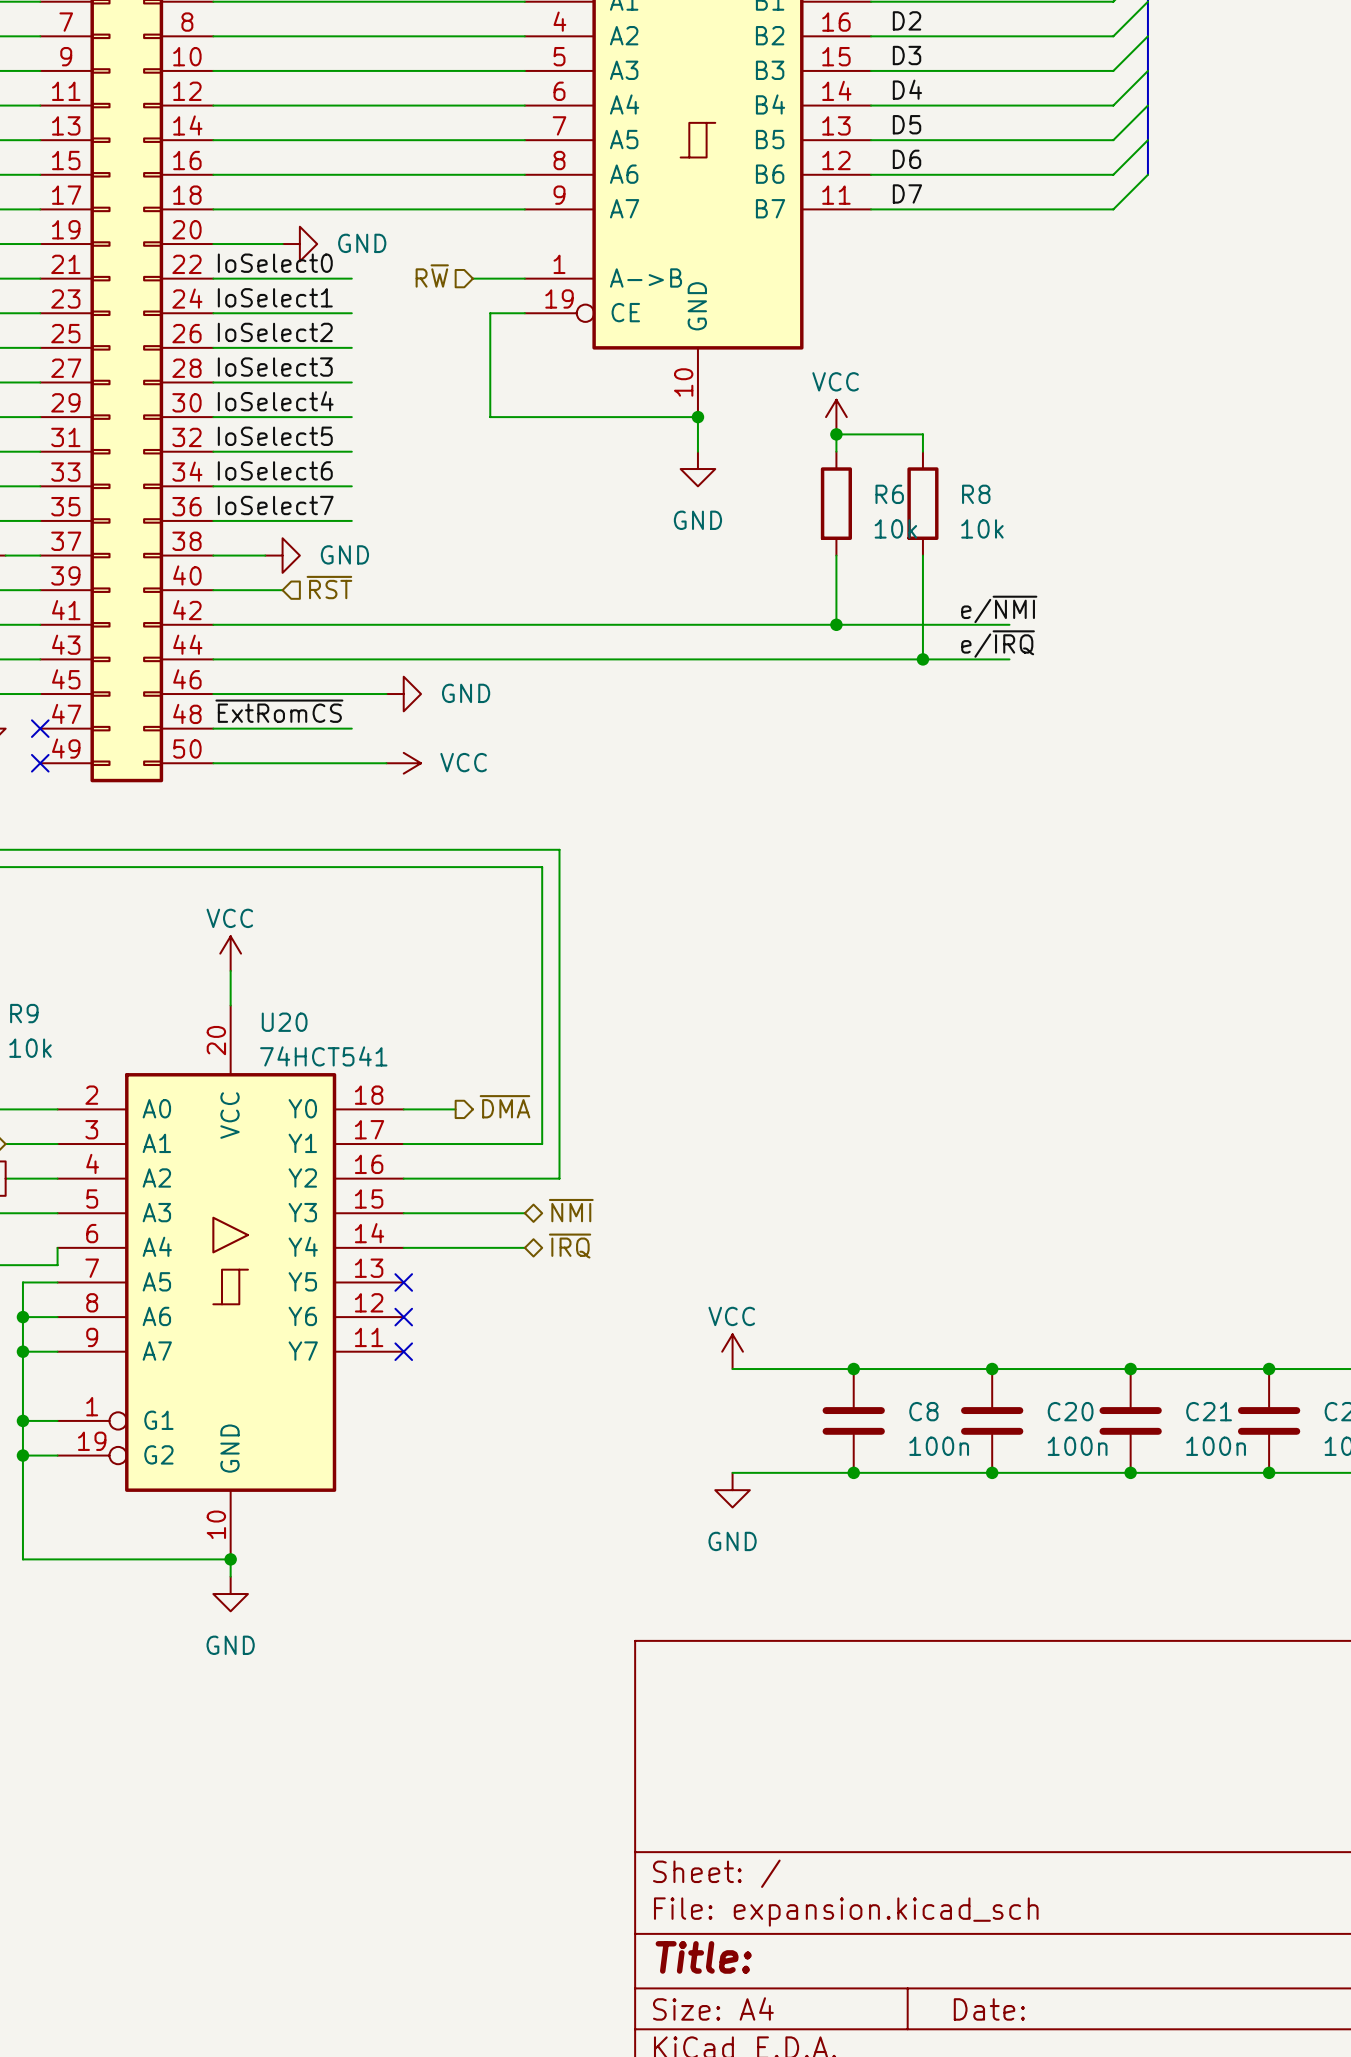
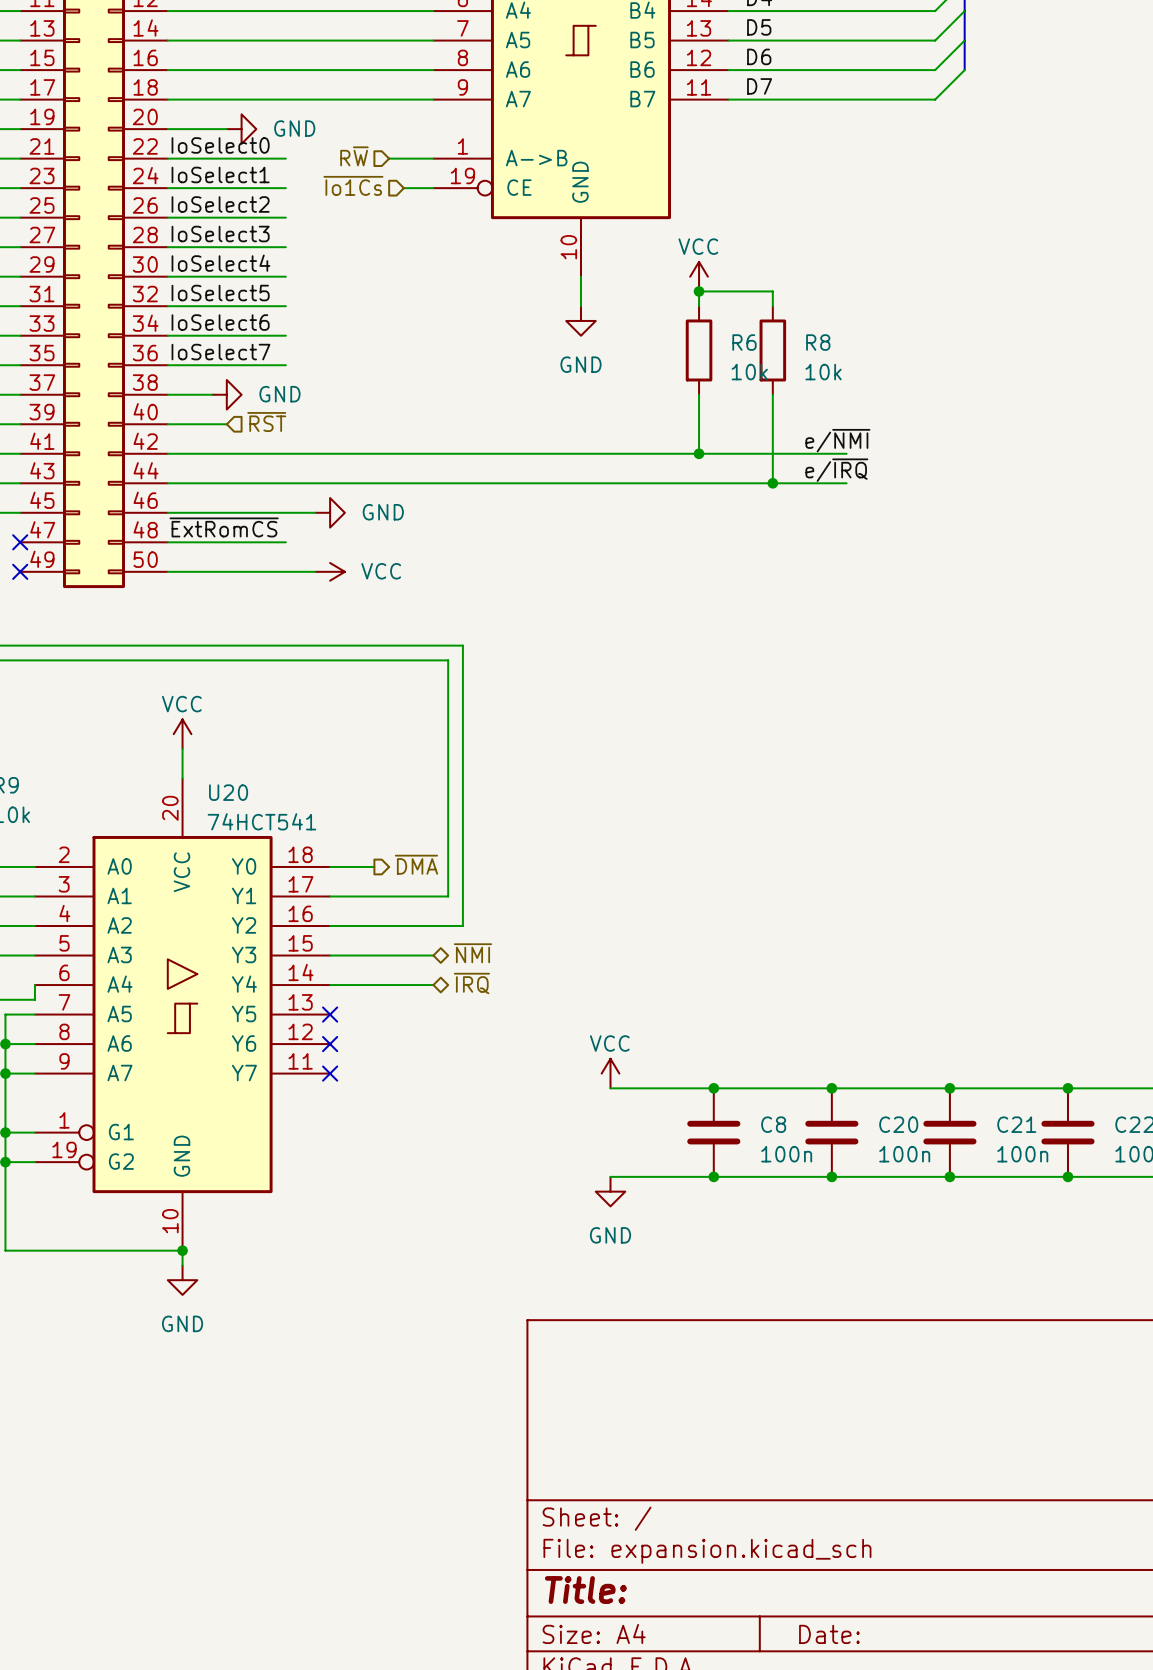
hierarchical label: none -> ~{Io1Cs} (353, 185)
wire: (490, 313) (490, 417) (697, 417) -> none
junction: (697, 417) -> none

